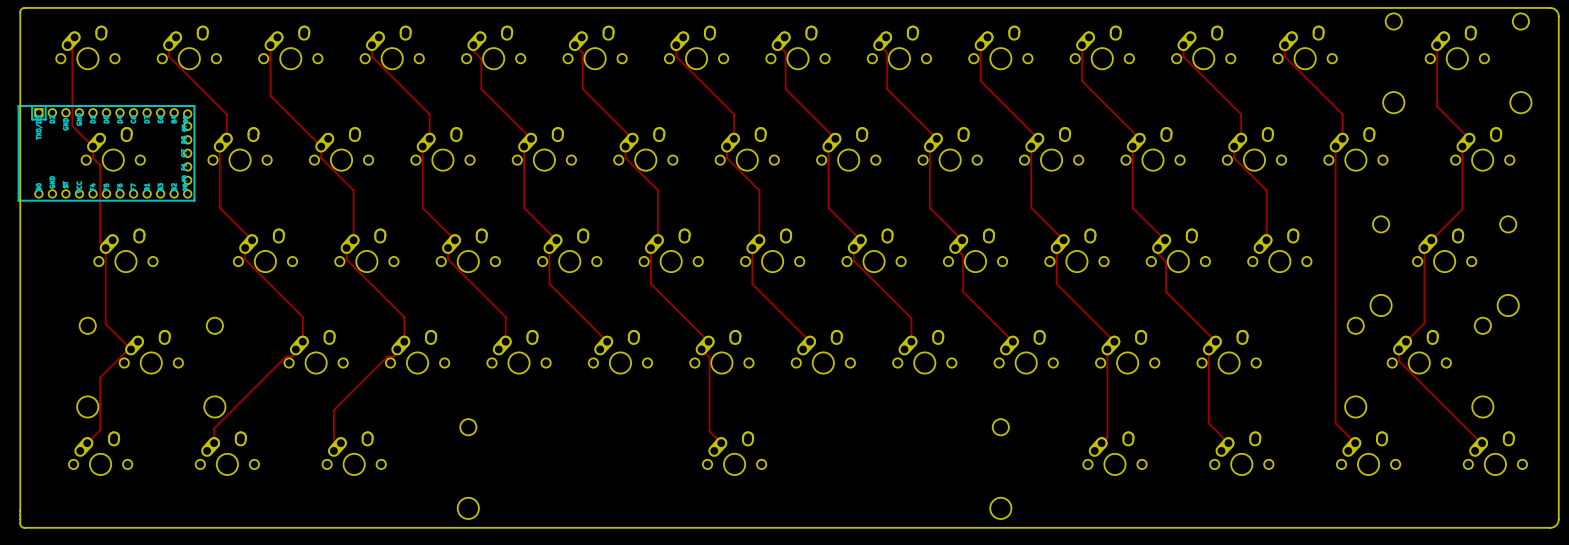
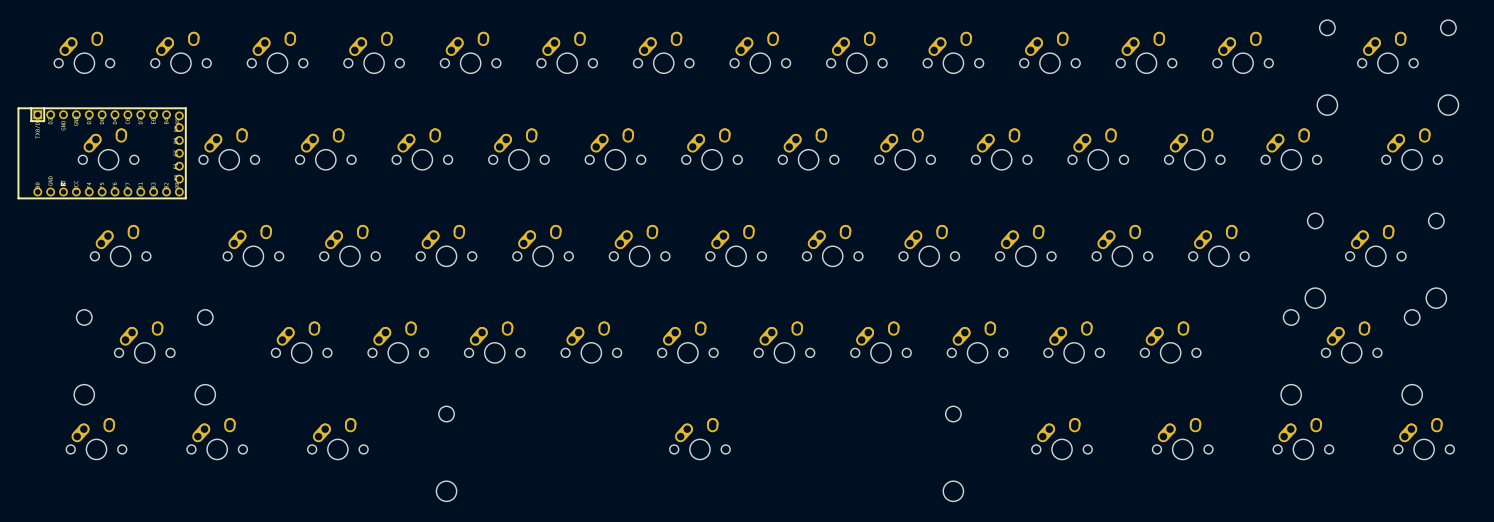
board edge: (1550, 7) (23, 8) (20, 12) (20, 524) (24, 527) (1552, 527) (1557, 524) (1558, 519) (1558, 16) (1556, 10) (1550, 7) -> none
track: (67, 45) (72, 49) (72, 125) (92, 146) (92, 158) (100, 165) (100, 242) (105, 248) (105, 324) (131, 349) (128, 349) (100, 377) (100, 430) (87, 443) -> none
track: (169, 45) (169, 56) (226, 114) (226, 138) -> none
track: (270, 45) (270, 95) (321, 146) (321, 158) (353, 190) (353, 240) -> none
track: (371, 45) (371, 56) (429, 114) (429, 138) -> none
track: (473, 45) (473, 51) (481, 58) (481, 89) (531, 138) -> none
track: (574, 45) (582, 52) (582, 89) (632, 138) -> none
track: (676, 45) (676, 56) (733, 114) (733, 138) -> none
track: (777, 45) (785, 52) (785, 89) (835, 138) -> none
track: (879, 45) (887, 52) (887, 89) (936, 138) -> none
track: (980, 45) (980, 81) (1038, 138) -> none
track: (1082, 45) (1082, 81) (1139, 138) -> none
track: (1183, 45) (1183, 56) (1241, 114) (1241, 138) -> none
track: (1284, 45) (1284, 56) (1342, 114) (1342, 138) -> none
track: (1437, 45) (1437, 106) (1469, 138) -> none
track: (219, 146) (219, 207) (252, 240) -> none
track: (422, 146) (422, 207) (454, 240) -> none
track: (524, 146) (524, 207) (556, 240) -> none
track: (625, 146) (625, 158) (657, 190) (657, 240) -> none
track: (726, 146) (726, 158) (759, 190) (759, 240) -> none
track: (828, 146) (828, 207) (860, 240) -> none
track: (929, 146) (929, 207) (962, 240) -> none
track: (1031, 146) (1031, 207) (1063, 240) -> none
track: (1132, 146) (1132, 207) (1165, 240) -> none
track: (1234, 146) (1234, 158) (1266, 190) (1266, 240) -> none
track: (1335, 146) (1335, 423) (1355, 443) -> none
track: (1462, 146) (1462, 209) (1431, 240) -> none
track: (245, 248) (245, 259) (302, 317) (302, 341) -> none
track: (346, 248) (346, 259) (404, 317) (404, 341) -> none
track: (448, 248) (448, 259) (505, 317) (505, 341) -> none
track: (549, 248) (549, 283) (607, 341) -> none
track: (650, 248) (650, 283) (708, 341) -> none
track: (752, 248) (752, 283) (810, 341) -> none
track: (853, 248) (853, 260) (911, 318) (911, 341) -> none
track: (955, 248) (963, 255) (963, 291) (1012, 341) -> none
track: (1056, 248) (1056, 283) (1114, 341) -> none
track: (1158, 248) (1158, 253) (1166, 261) (1166, 291) (1215, 341) -> none
track: (1424, 248) (1424, 323) (1405, 341) -> none
track: (295, 349) (295, 352) (292, 356) (286, 356) (214, 428) (214, 443) -> none
track: (397, 349) (397, 352) (393, 356) (387, 356) (333, 410) (333, 450) -> none
track: (701, 349) (709, 357) (709, 431) (721, 443) -> none
track: (1107, 349) (1107, 437) (1101, 443) -> none
track: (1208, 349) (1208, 423) (1228, 443) -> none
track: (1399, 349) (1399, 360) (1482, 443) -> none

